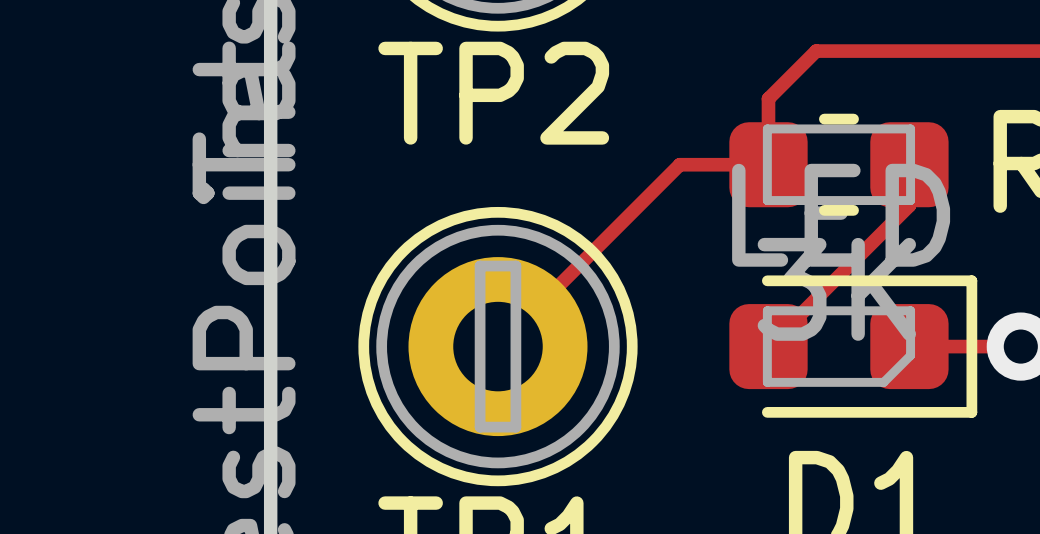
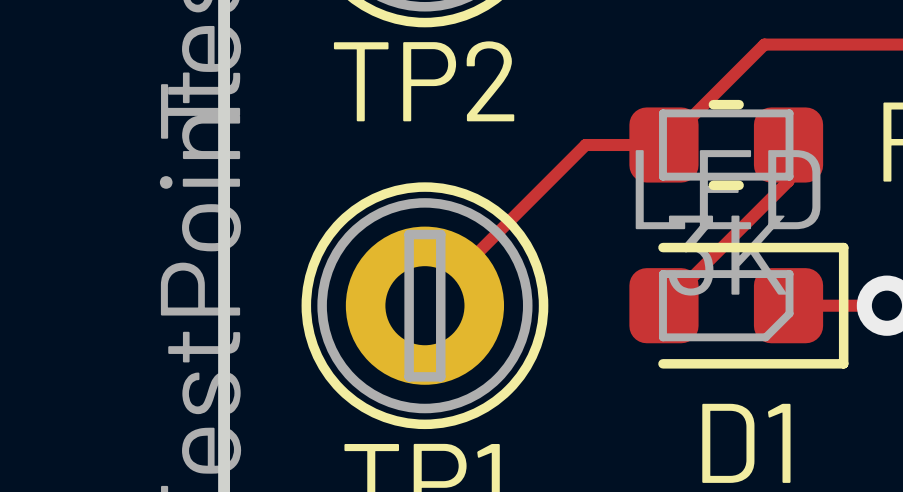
track: (882, 51) (816, 51) (768, 98) (768, 164) -> (764, 44) (663, 145)

